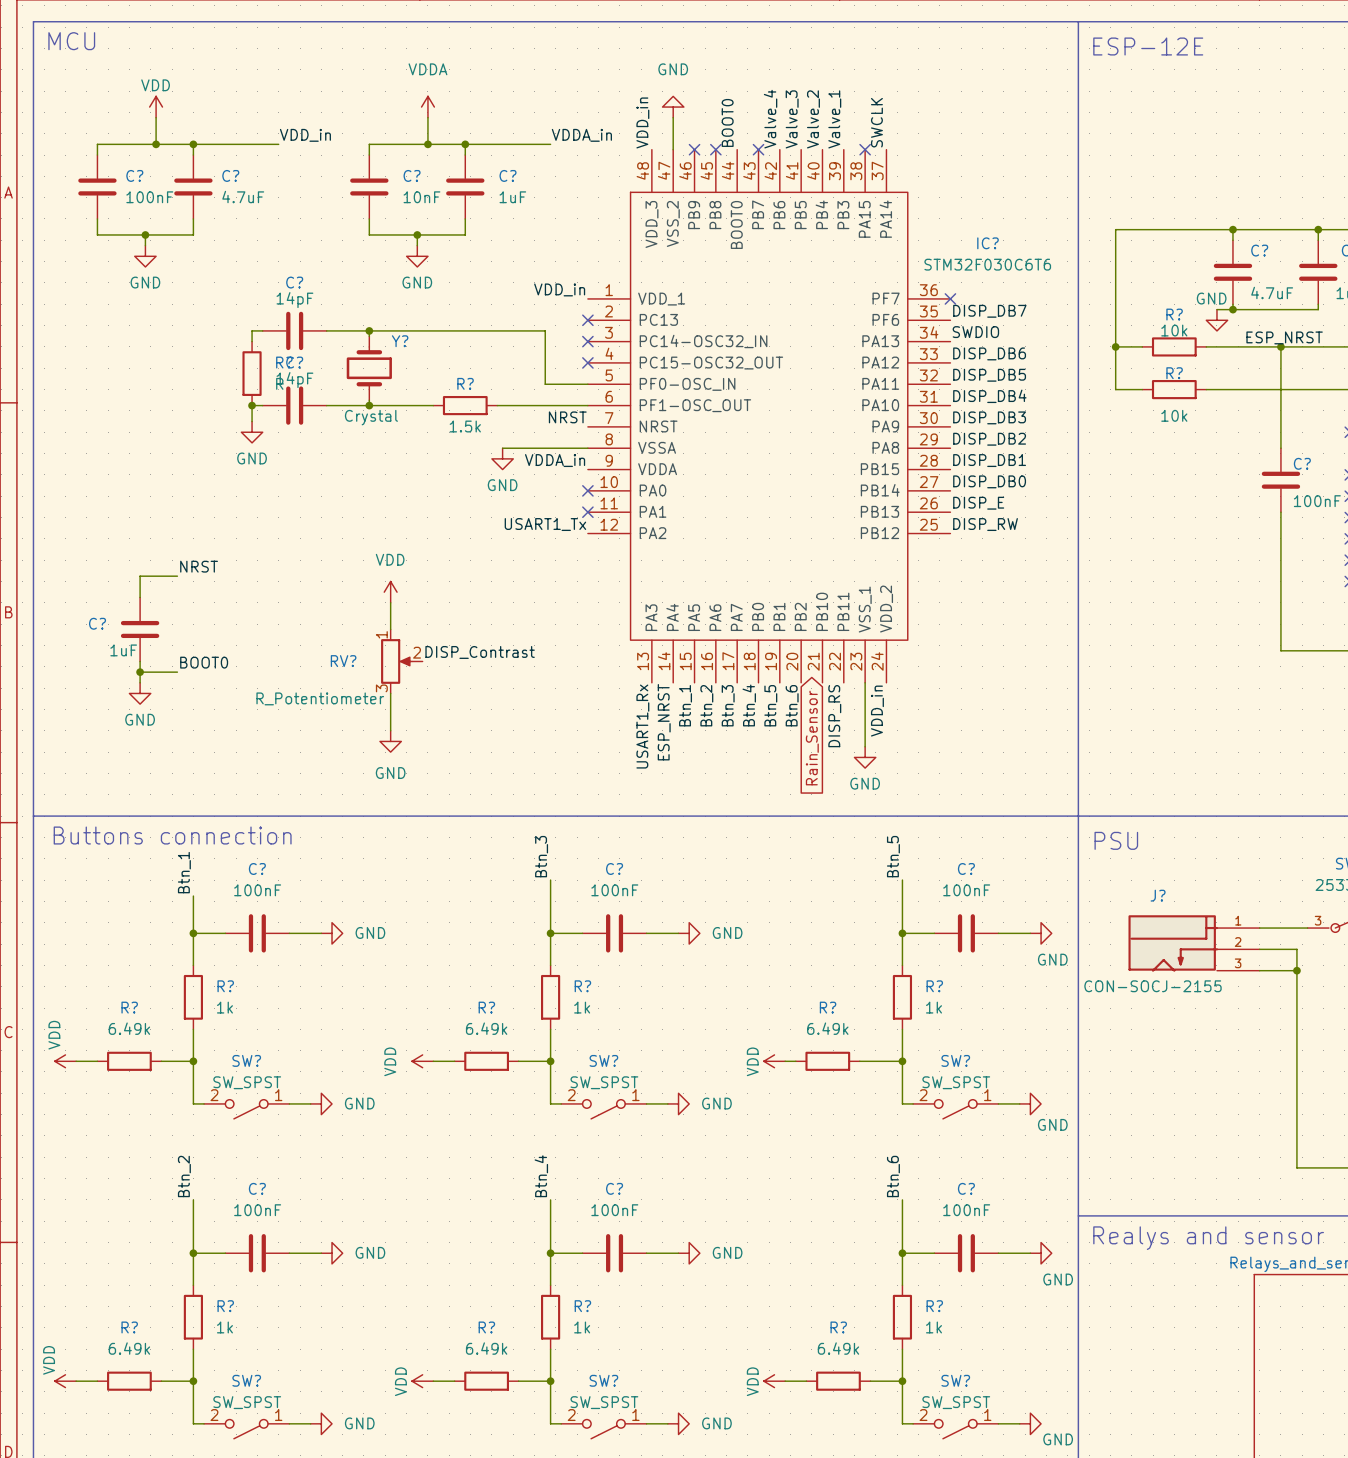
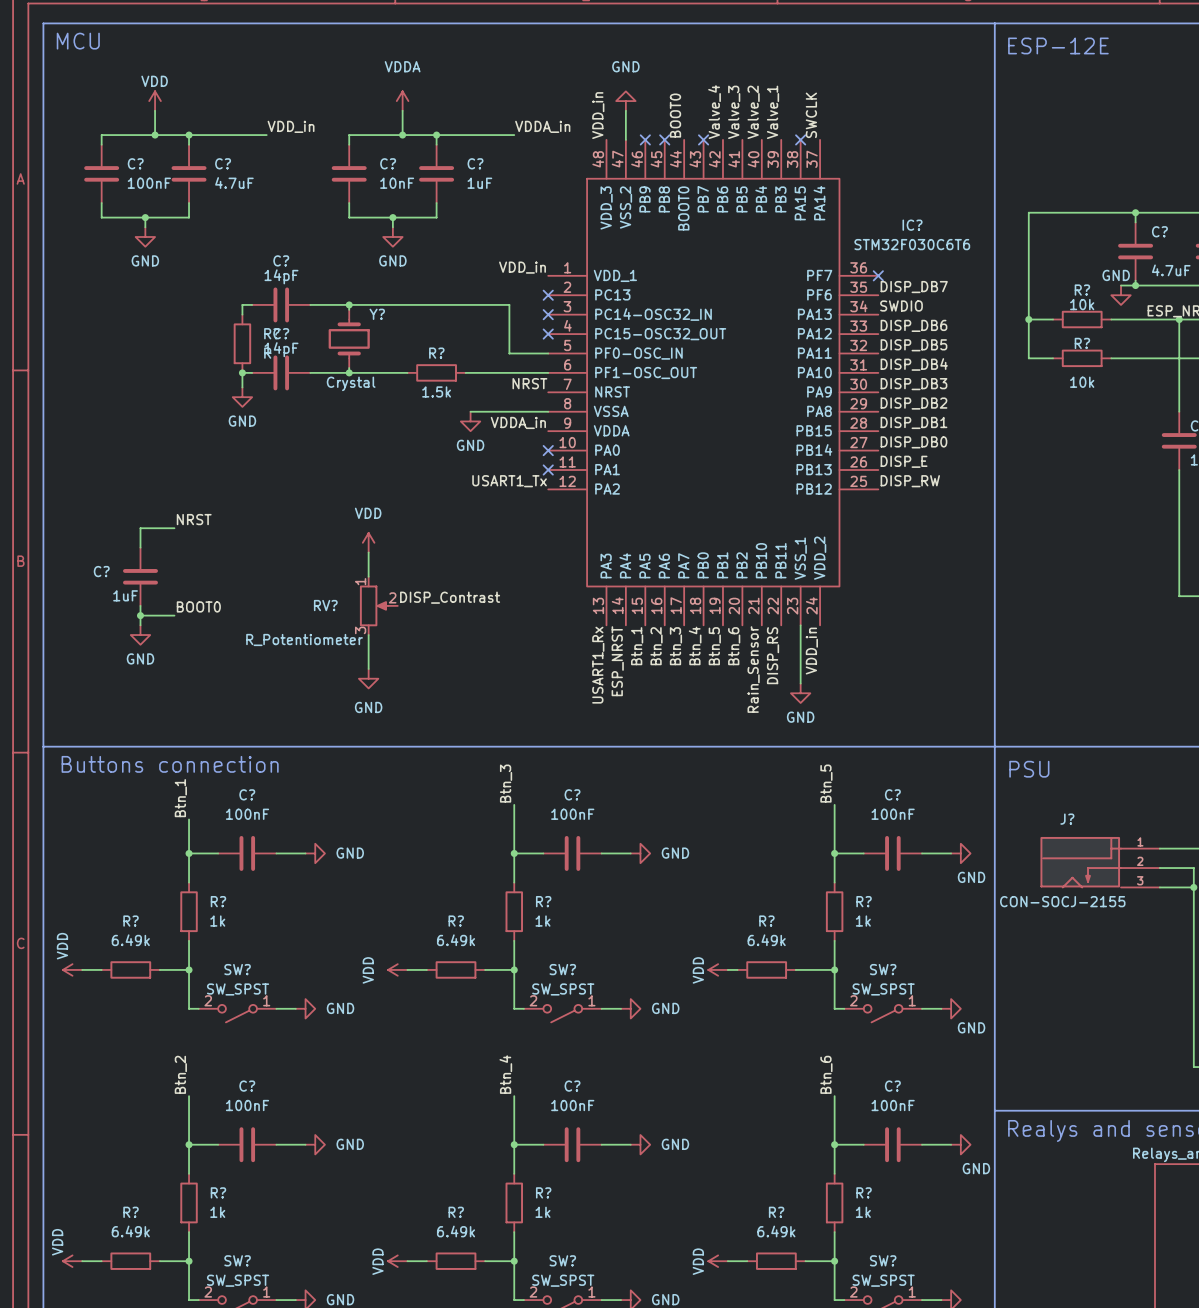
label: none -> Rain_Sensor (753, 669)
global label: Rain_Sensor (812, 738) -> none

